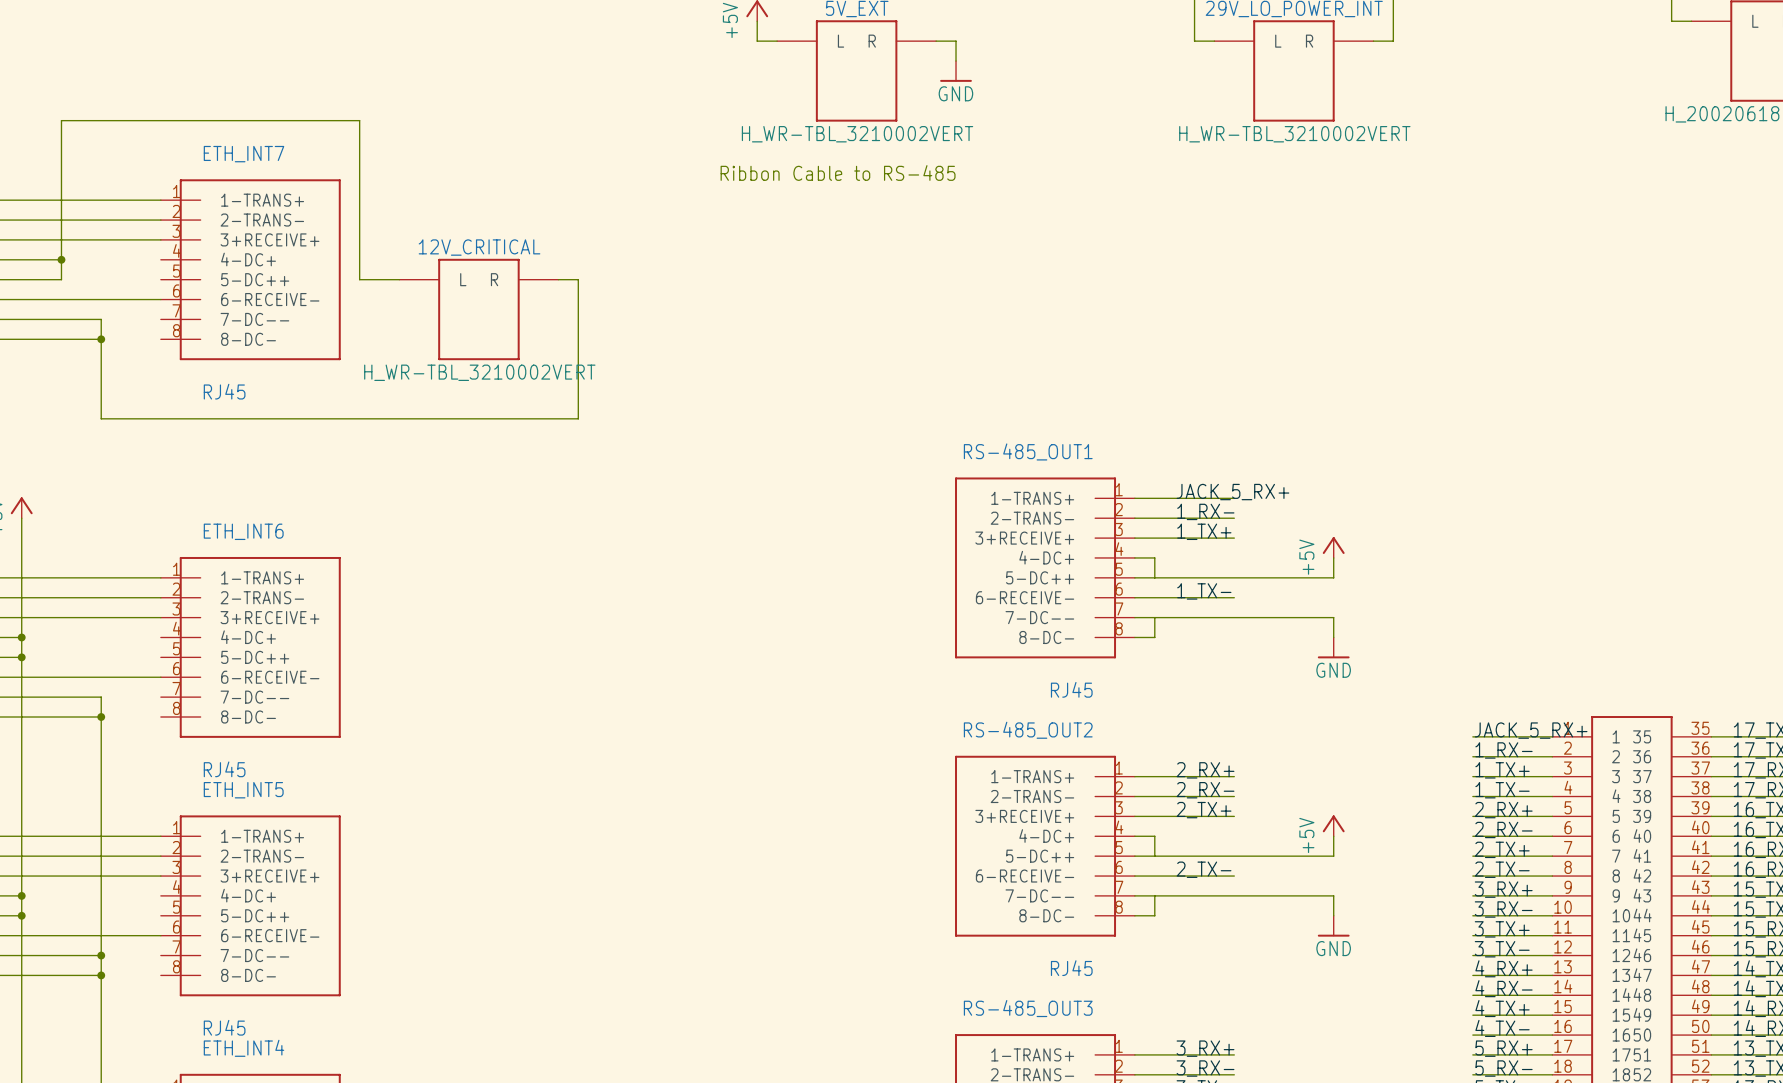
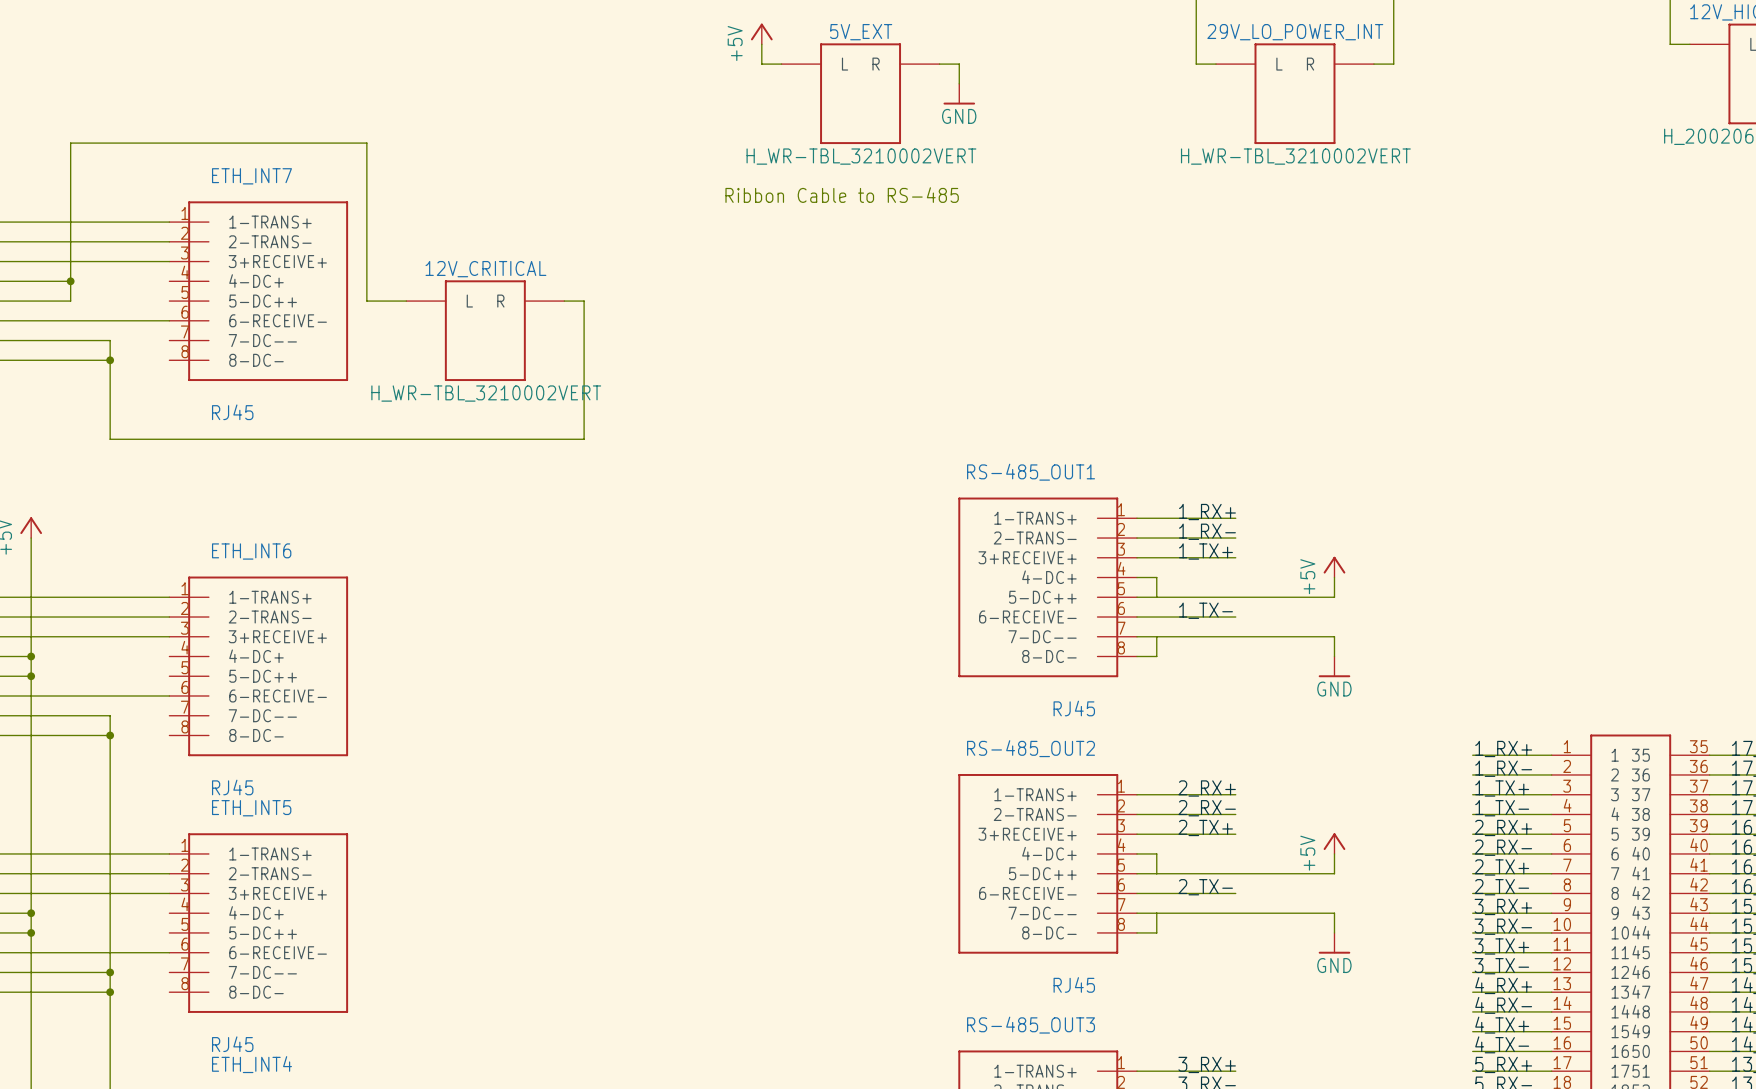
label: JACK_5_RX+ (1232, 492) -> 1_RX+ (1207, 512)
label: JACK_5_RX+ (1531, 730) -> 1_RX+ (1503, 748)

